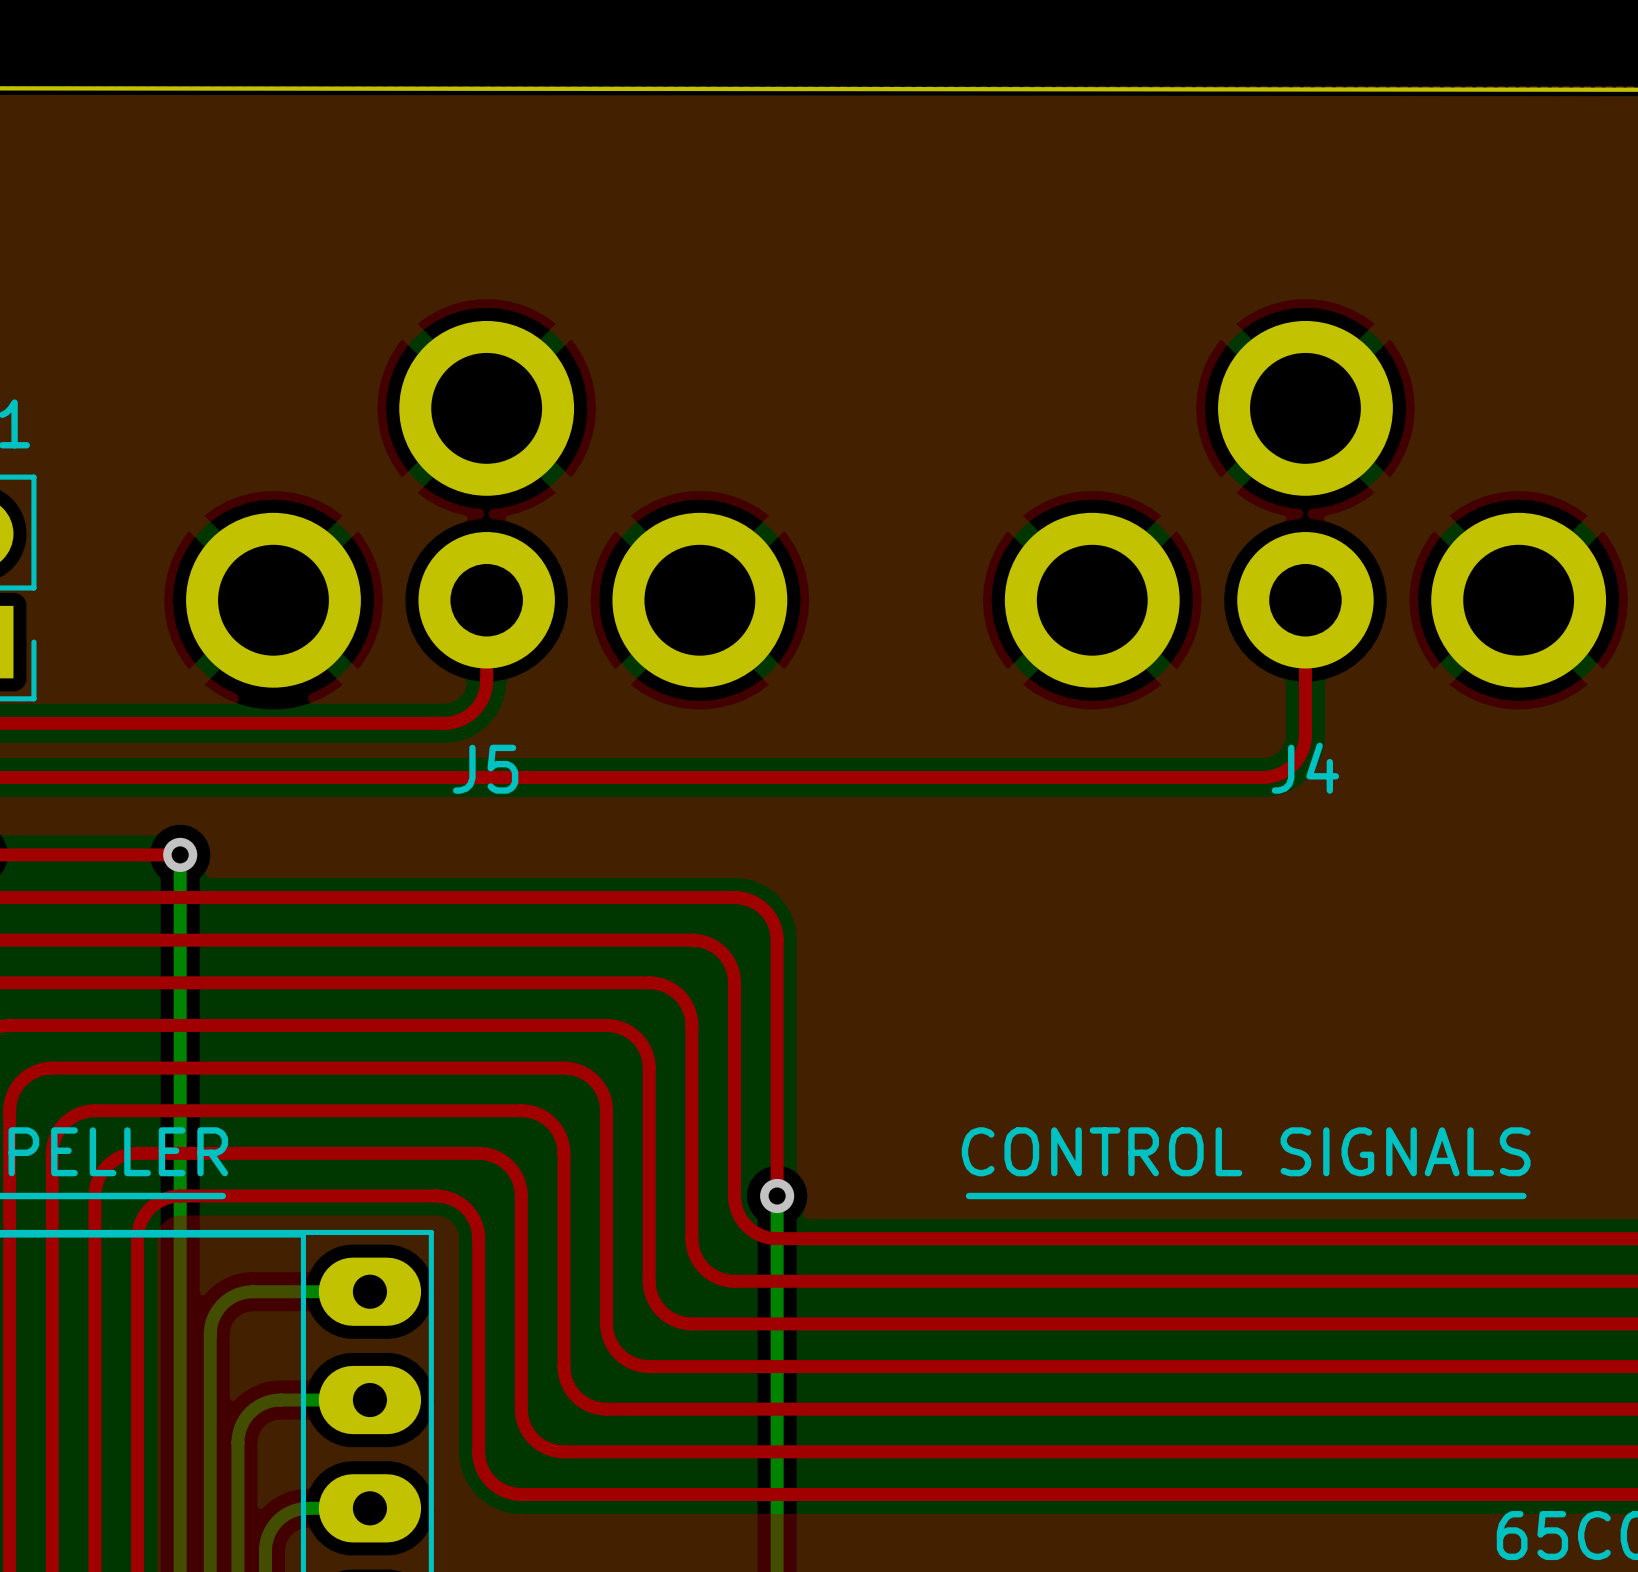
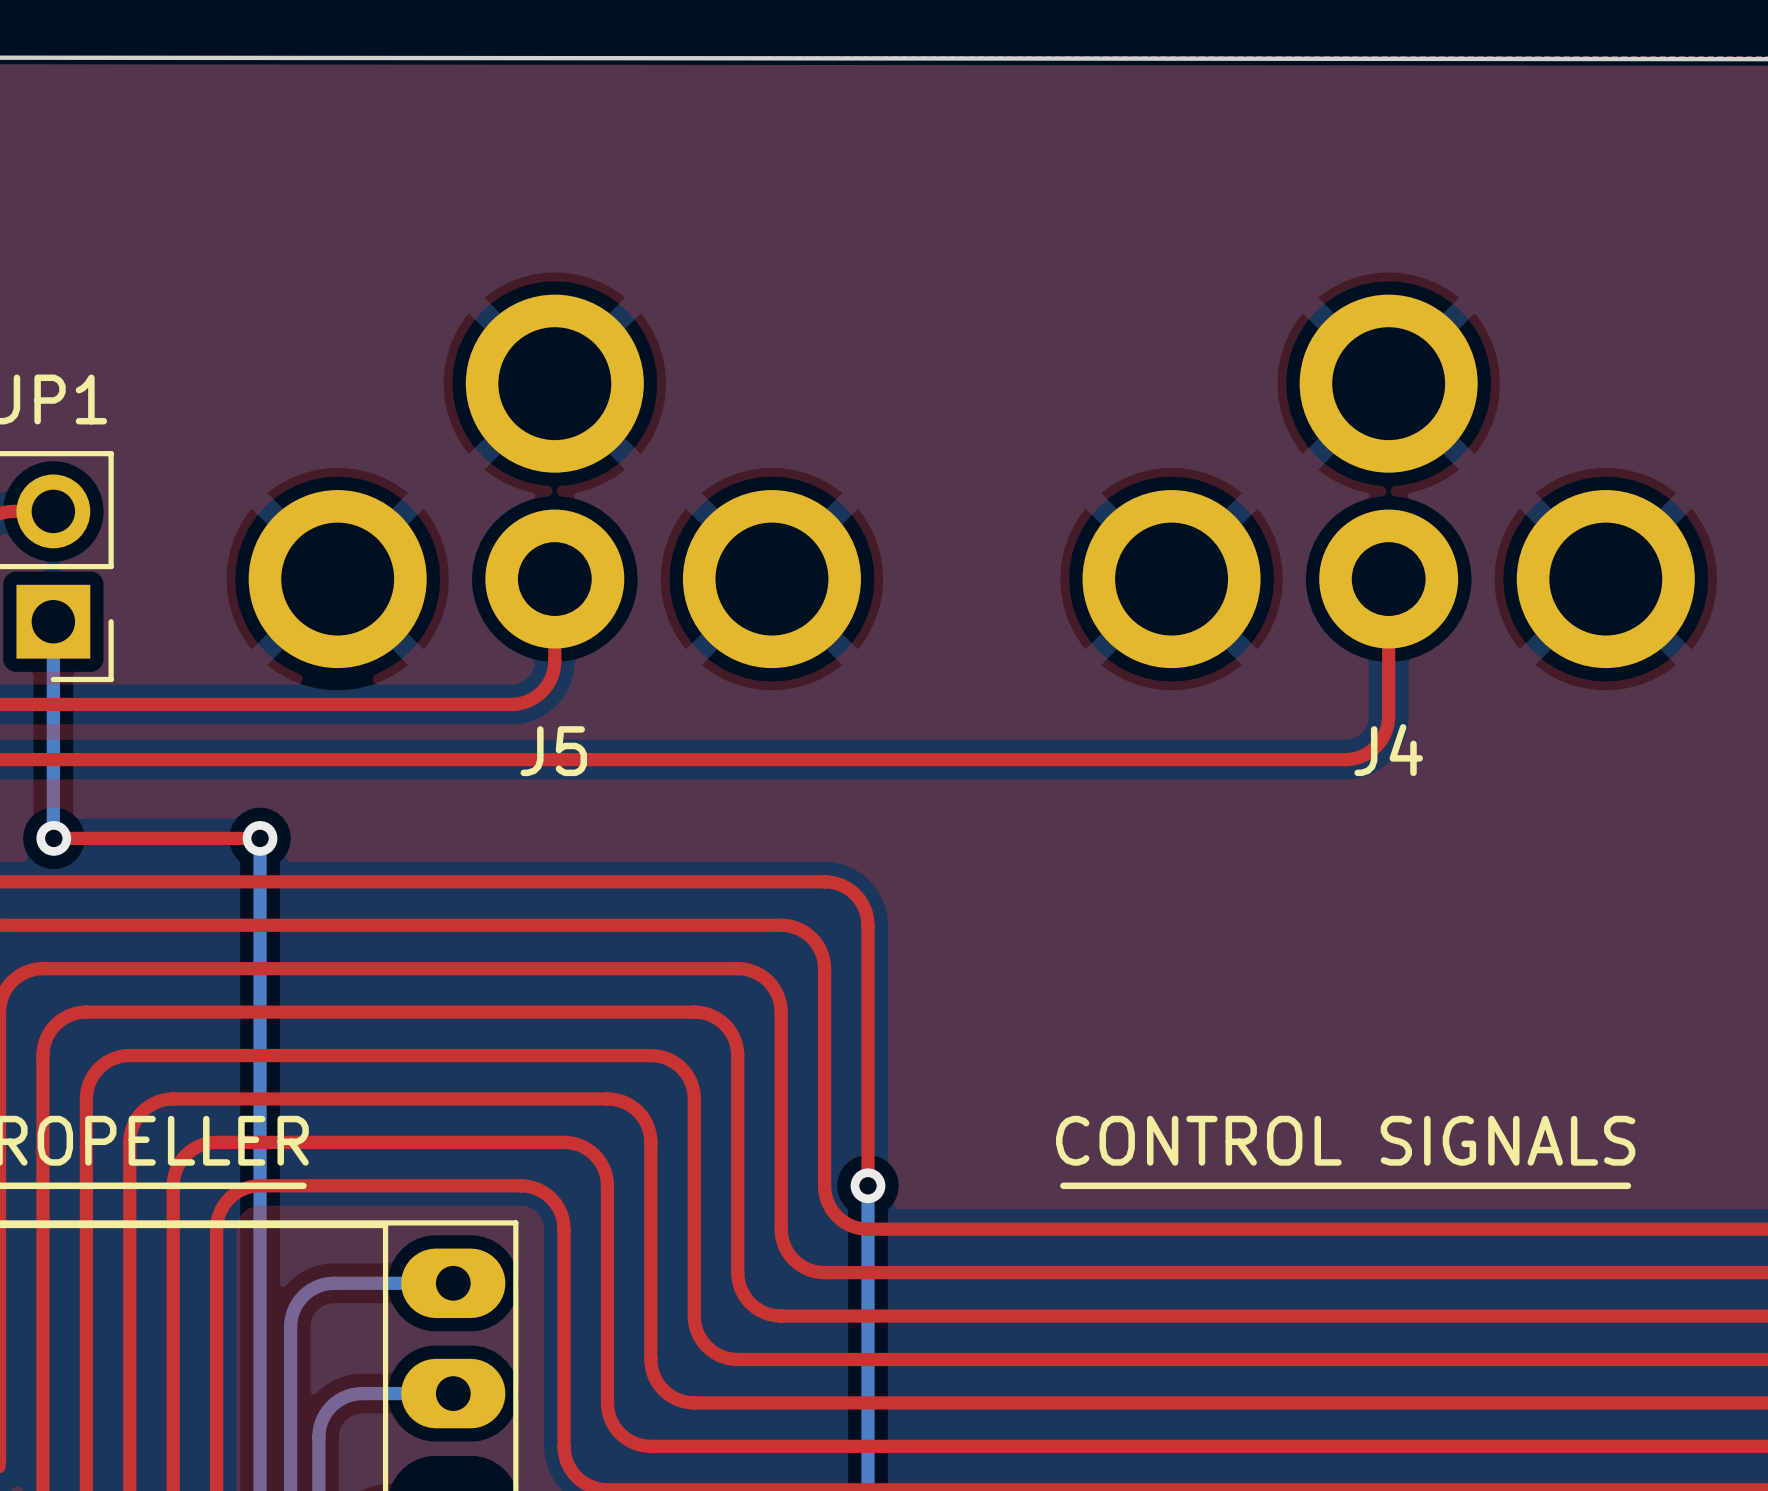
J5 position: (486, 504) -> (554, 481)
J4 position: (1305, 504) -> (1388, 481)
top track: (486, 600) (486, 680) (482, 699) (474, 710) (462, 719) (448, 723) (426, 723) -> (554, 579) (554, 661) (552, 675) (548, 684) (538, 694) (525, 702) (511, 704)
top track: (1305, 600) (1305, 734) (1303, 748) (1296, 761) (1281, 773) (1267, 777) (1245, 777) -> (1388, 579) (1387, 725) (1382, 739) (1372, 750) (1359, 757) (1345, 759)

